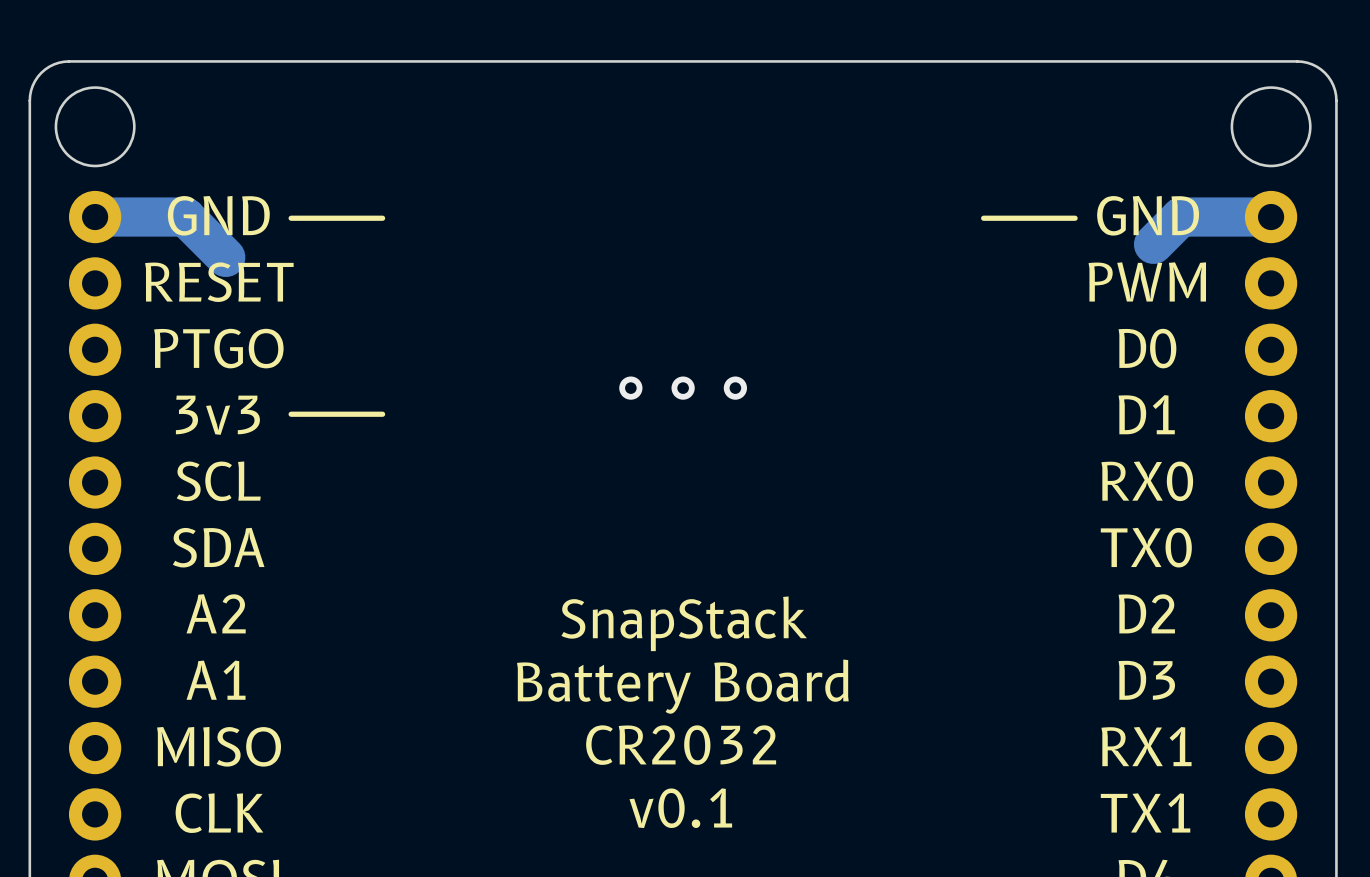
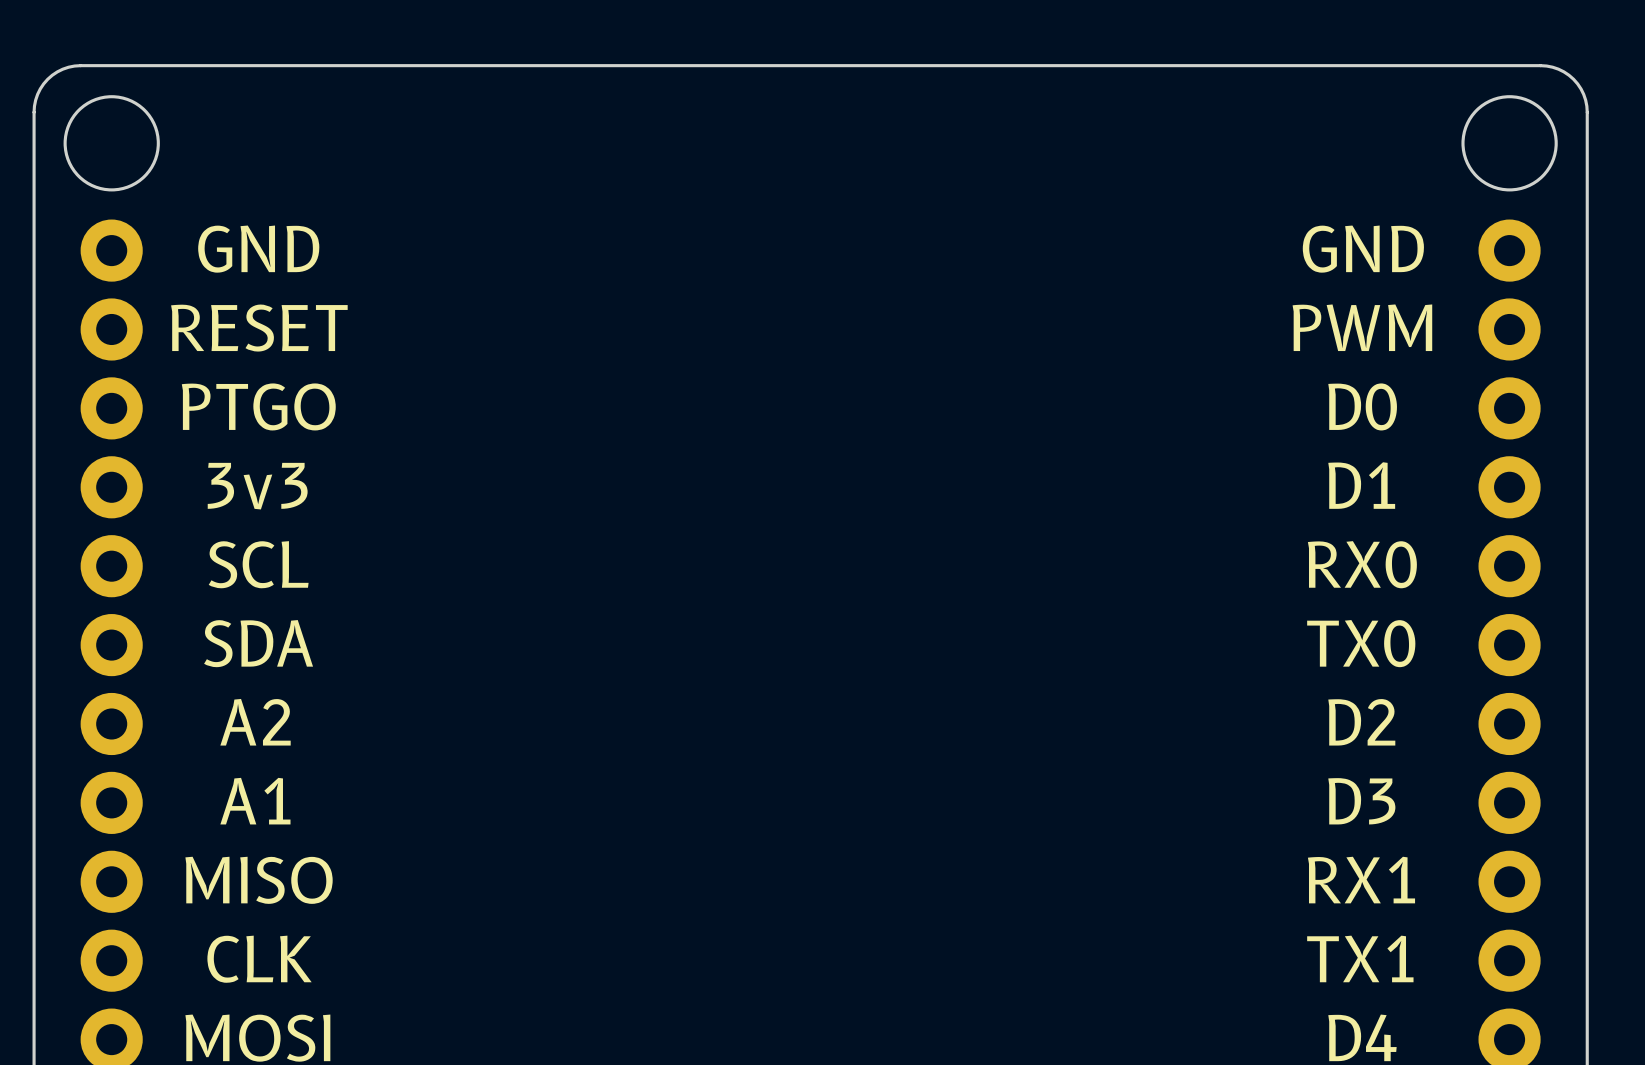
track: (95, 217) (185, 217) (225, 257) -> none
track: (1271, 217) (1180, 217) (1153, 244) -> none
line: (382, 218) (291, 218) -> none
line: (1075, 218) (983, 218) -> none
via: (630, 388) -> none
via: (683, 388) -> none
via: (735, 388) -> none
line: (382, 414) (291, 414) -> none
text: SnapStack (684, 623) -> none
text: Battery Board (682, 686) -> none
text: CR2032 (681, 745) -> none
text: v0.1 (680, 808) -> none

